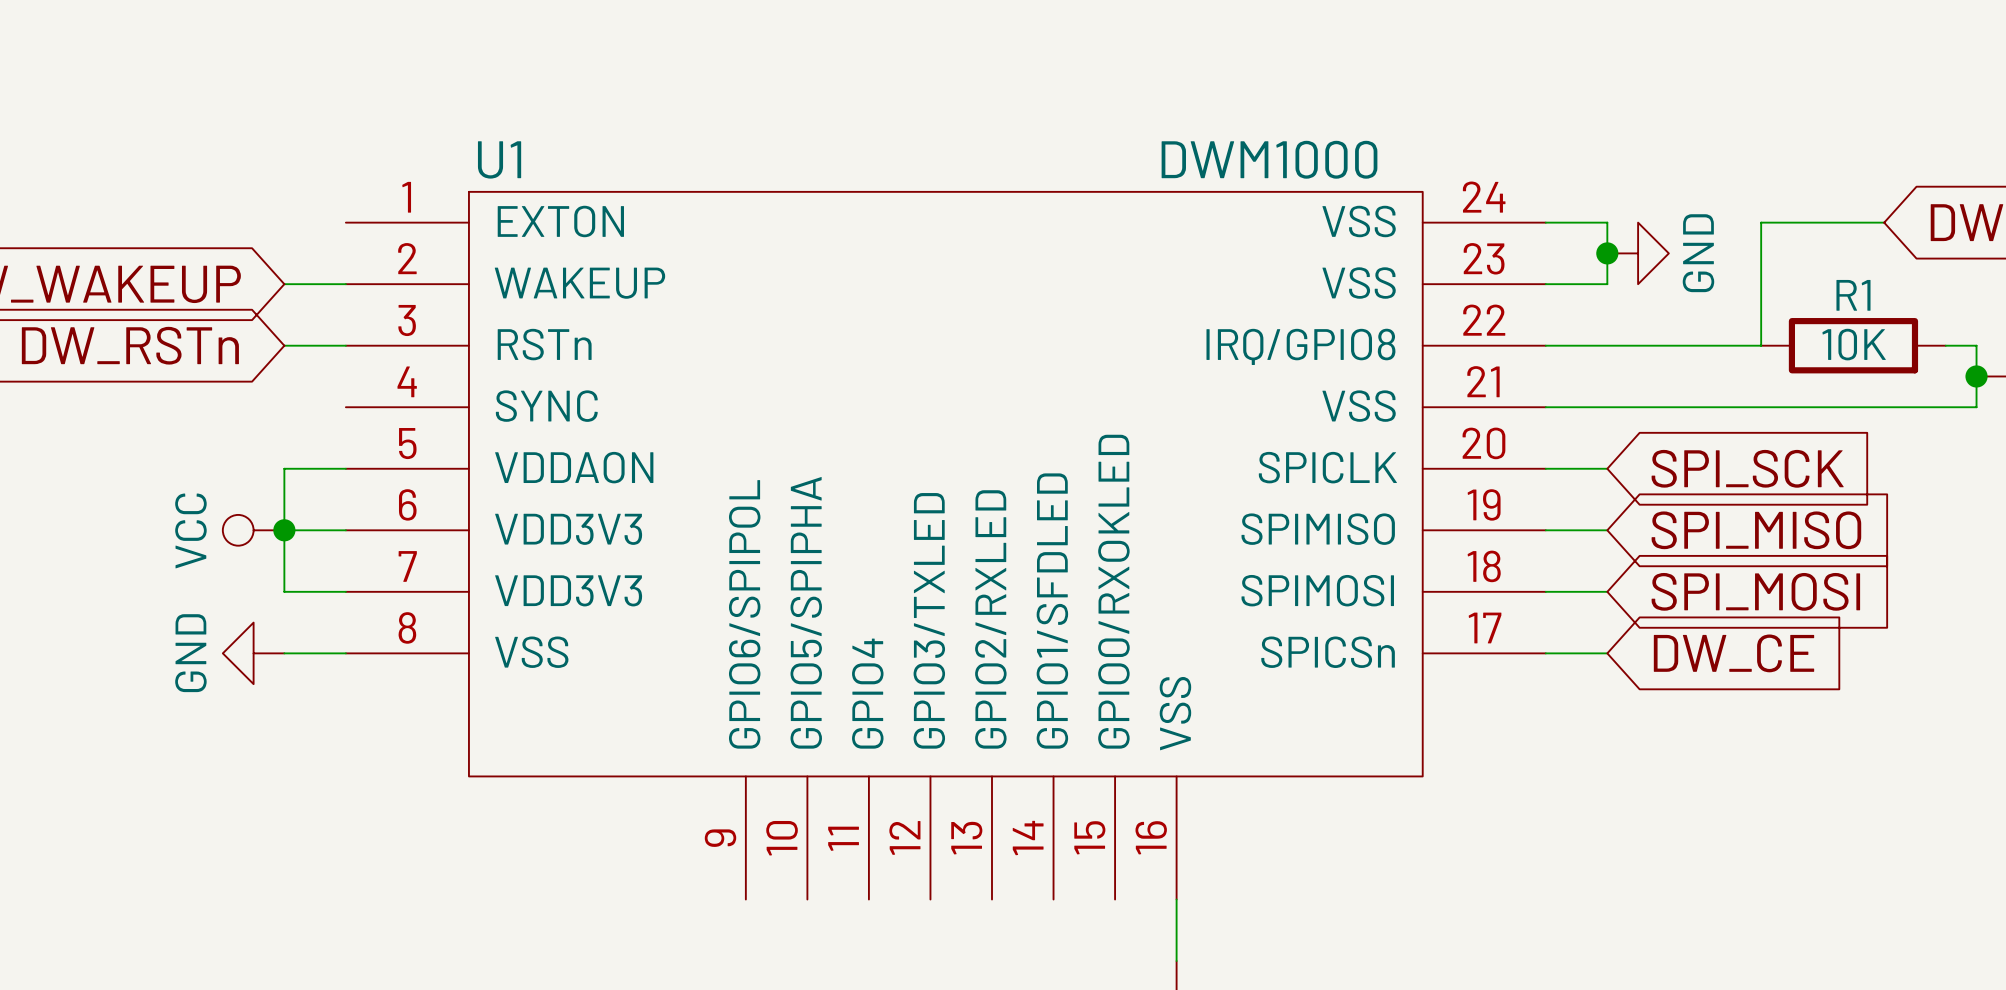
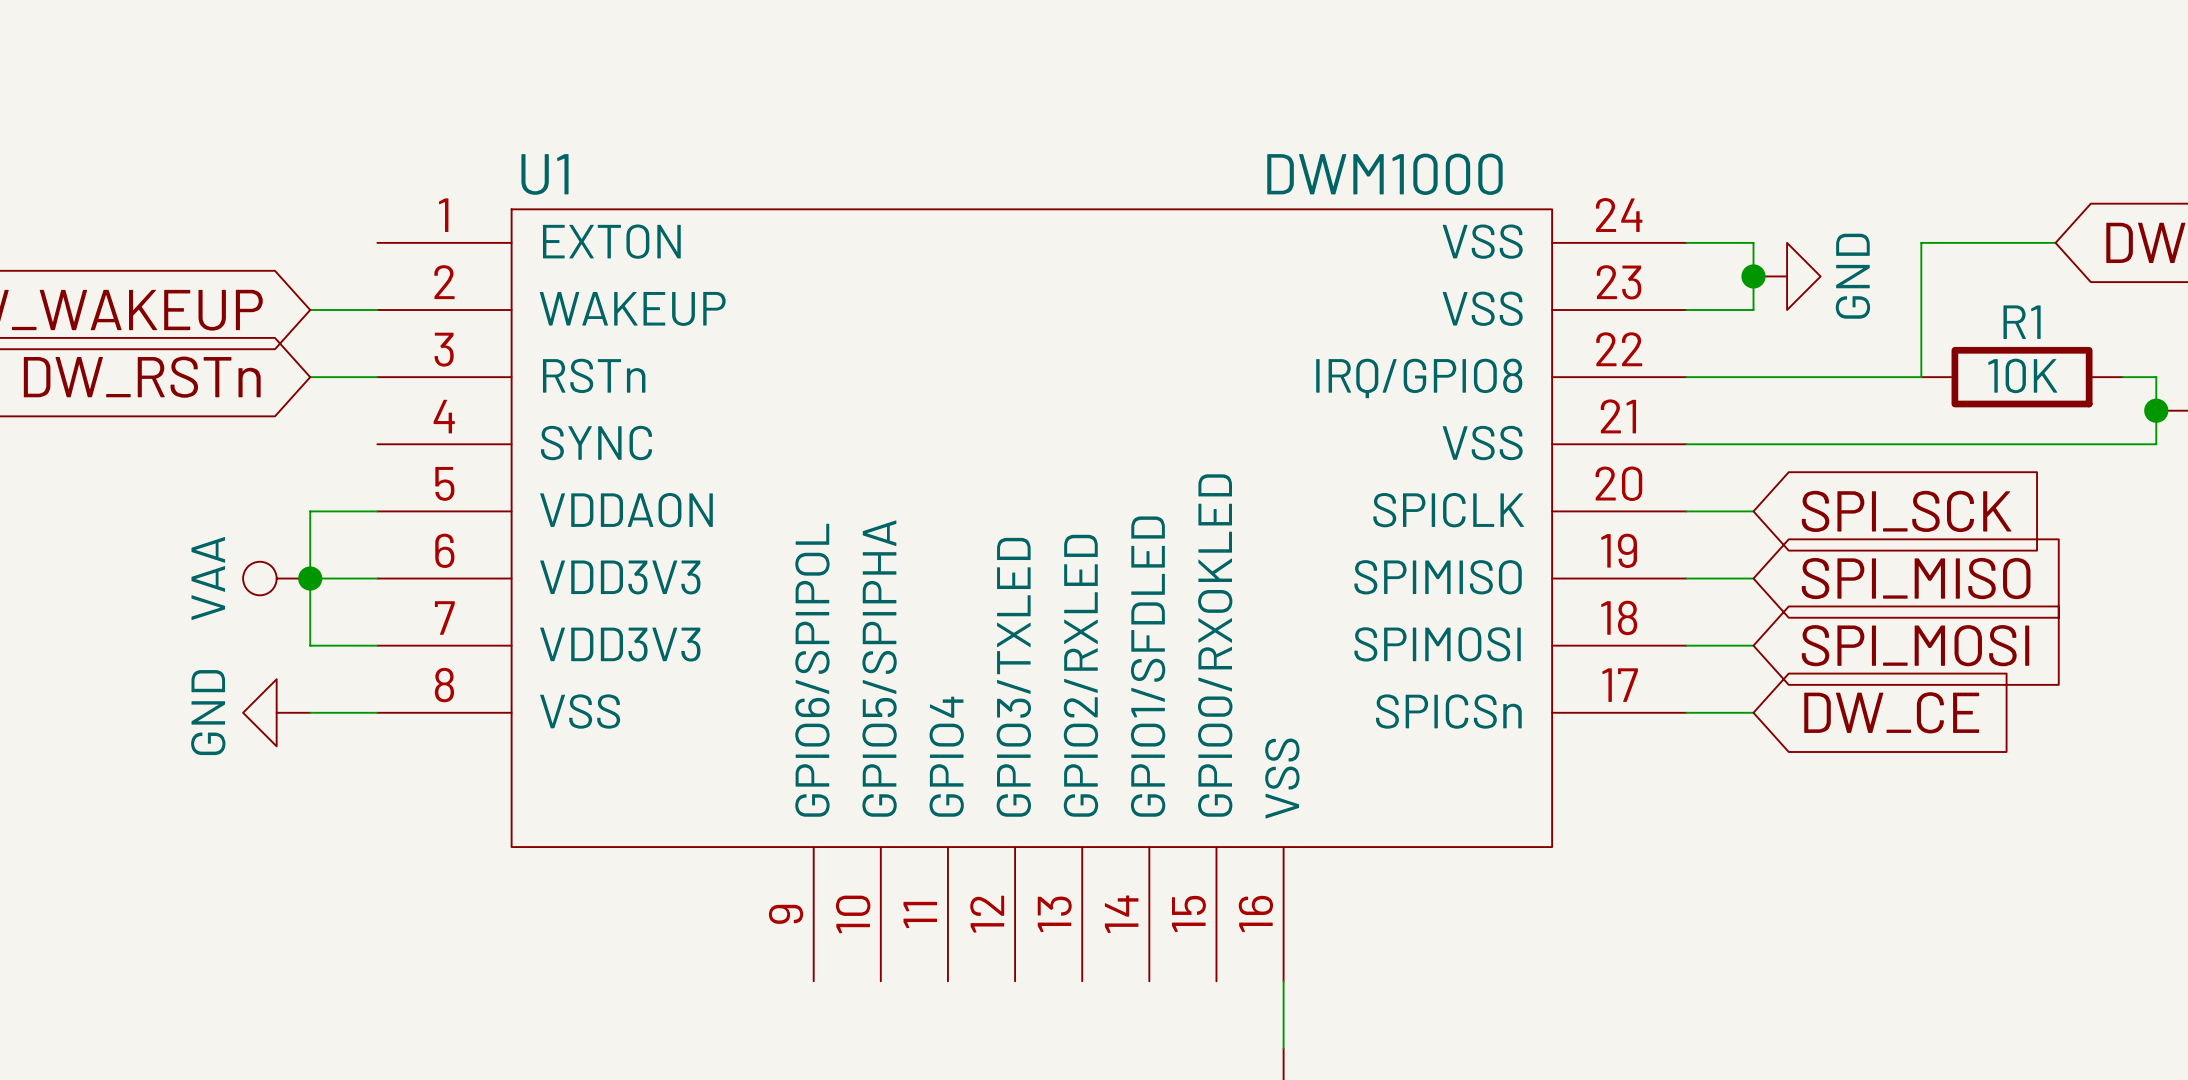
power symbol: VCC (253, 530) -> VAA (276, 578)

